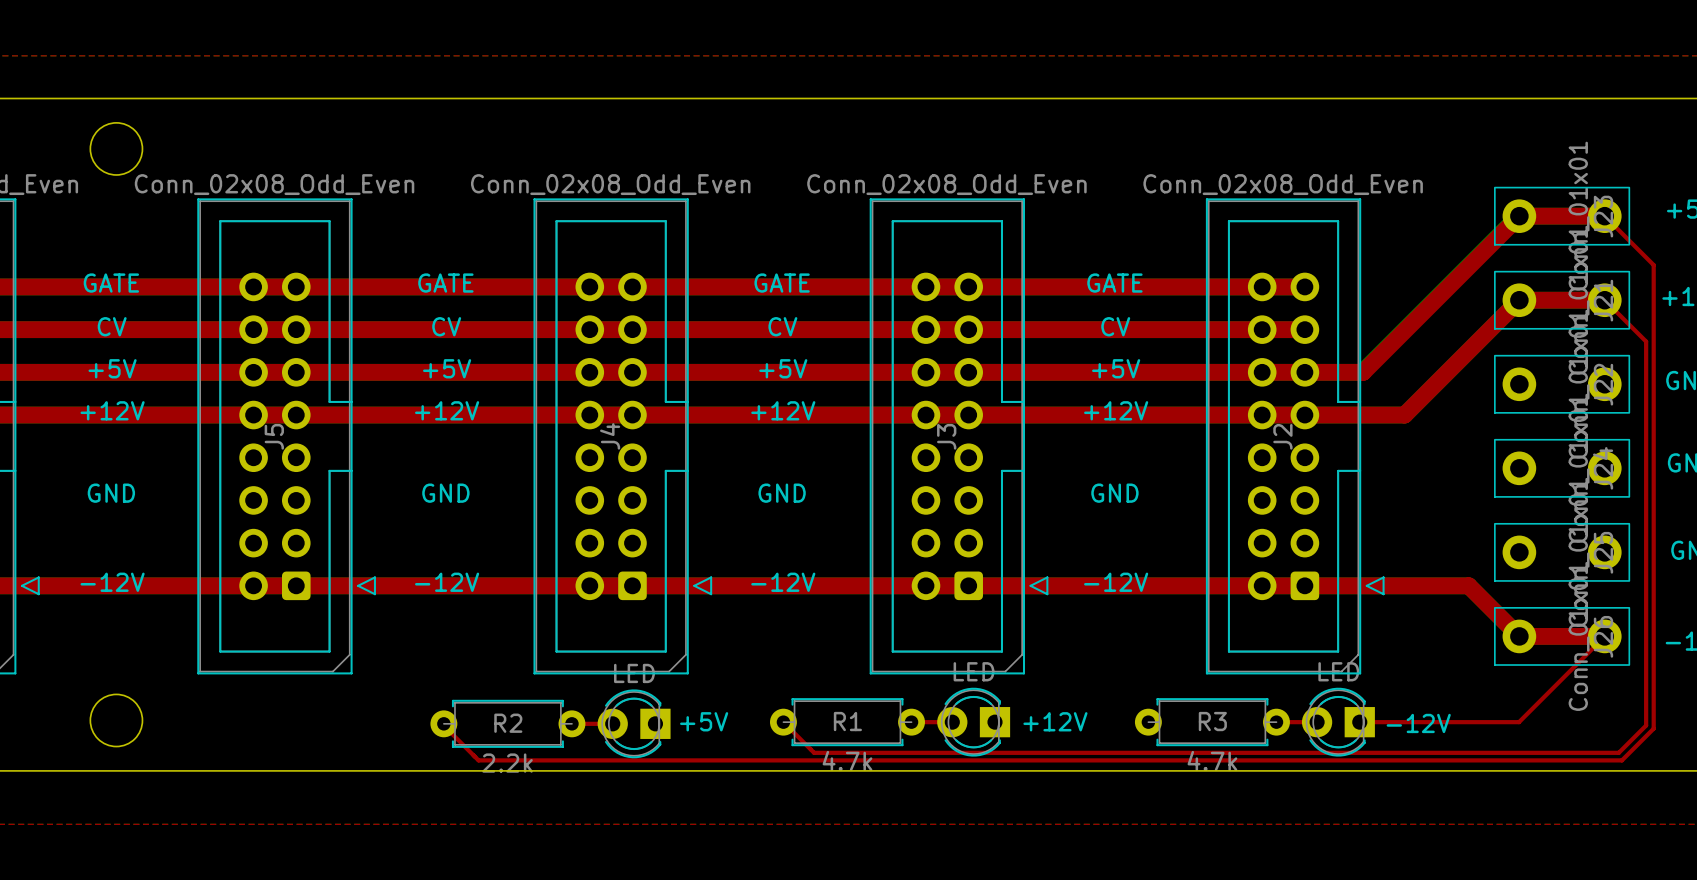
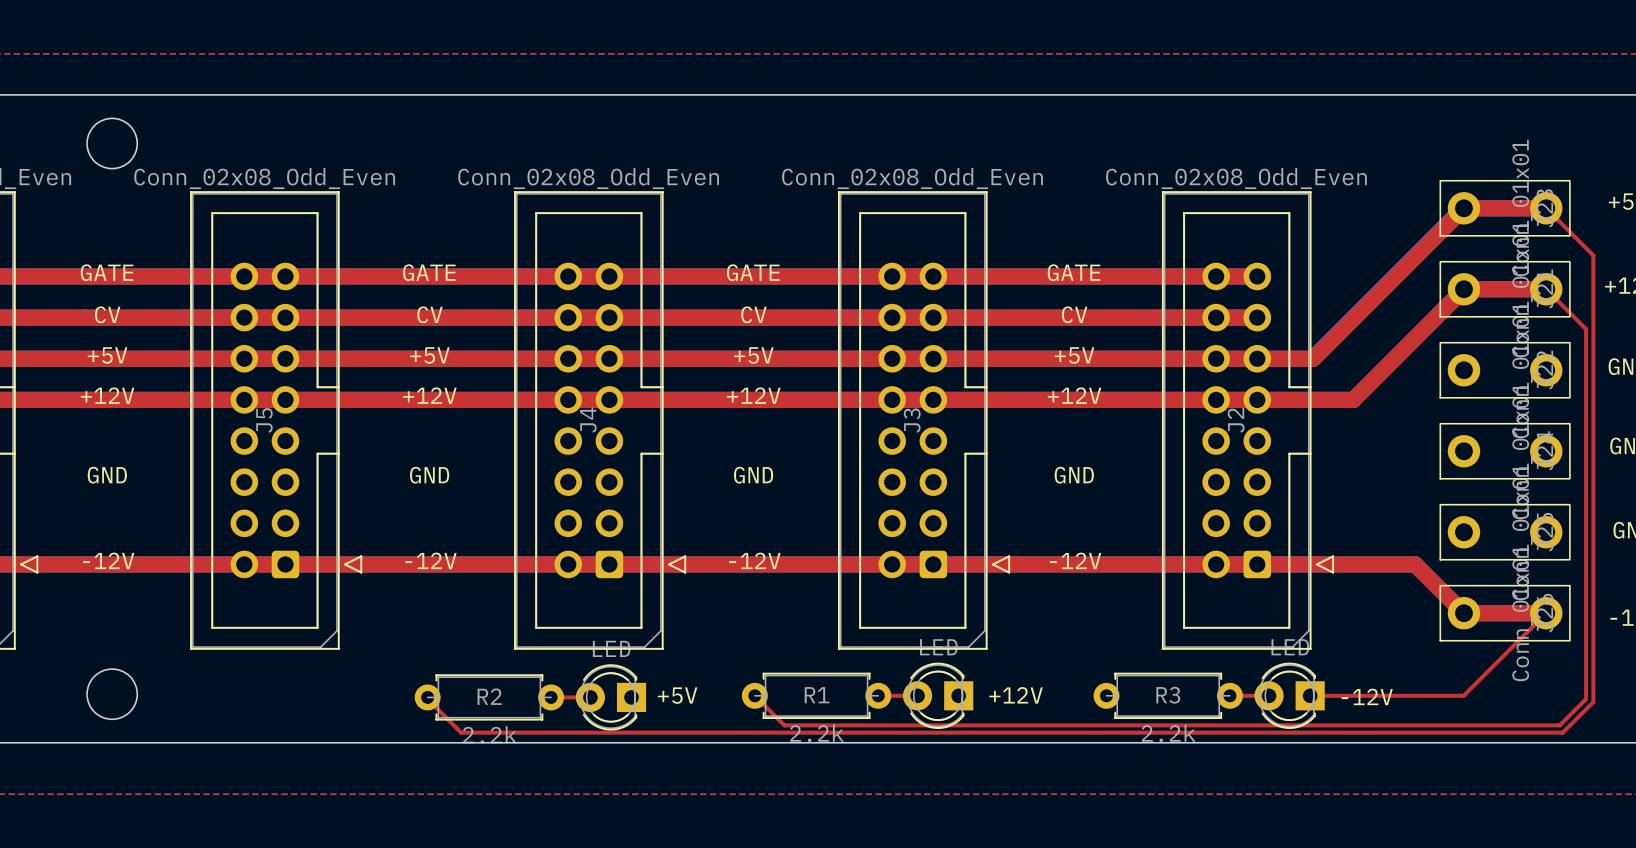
R1 value: 4.7k (847, 760) -> 2.2k (817, 733)
R3 value: 4.7k (1212, 760) -> 2.2k (1168, 733)

